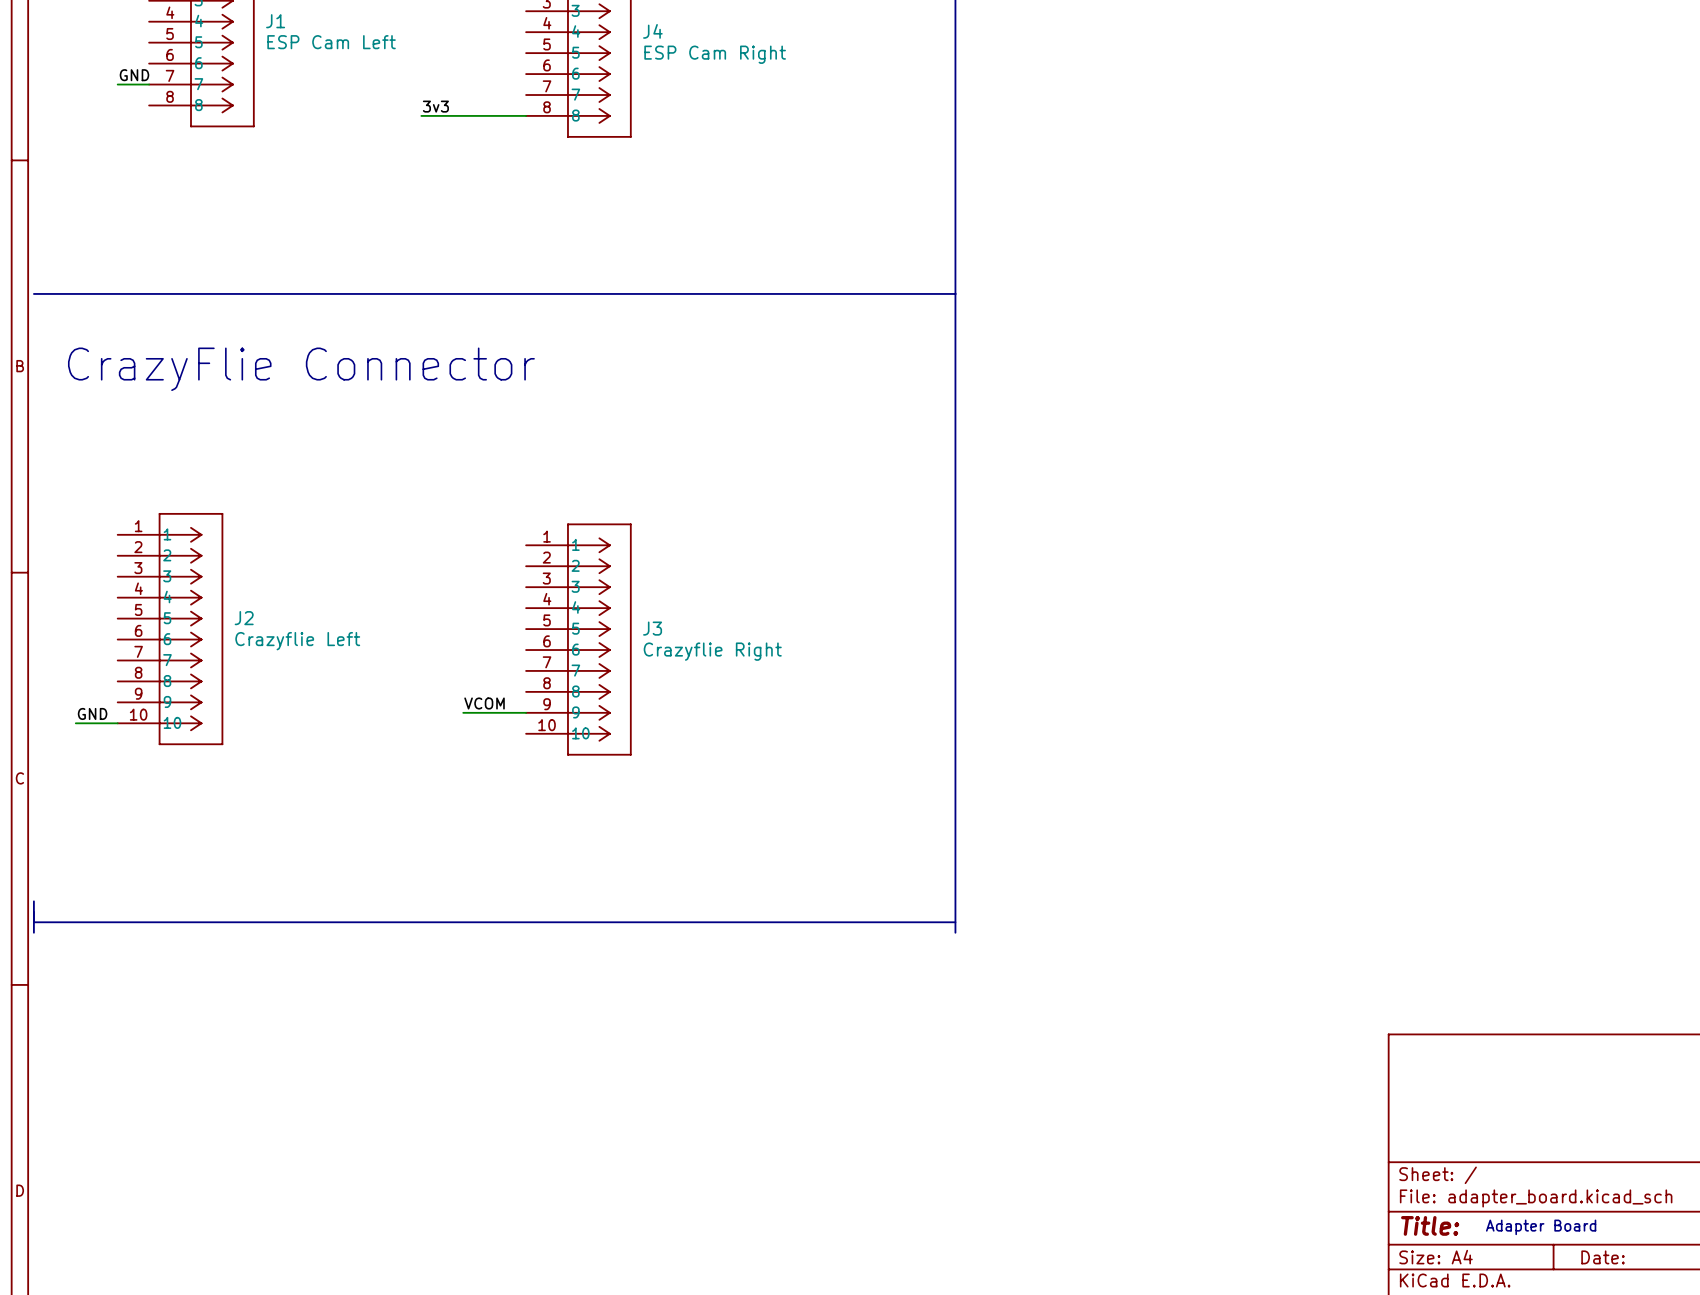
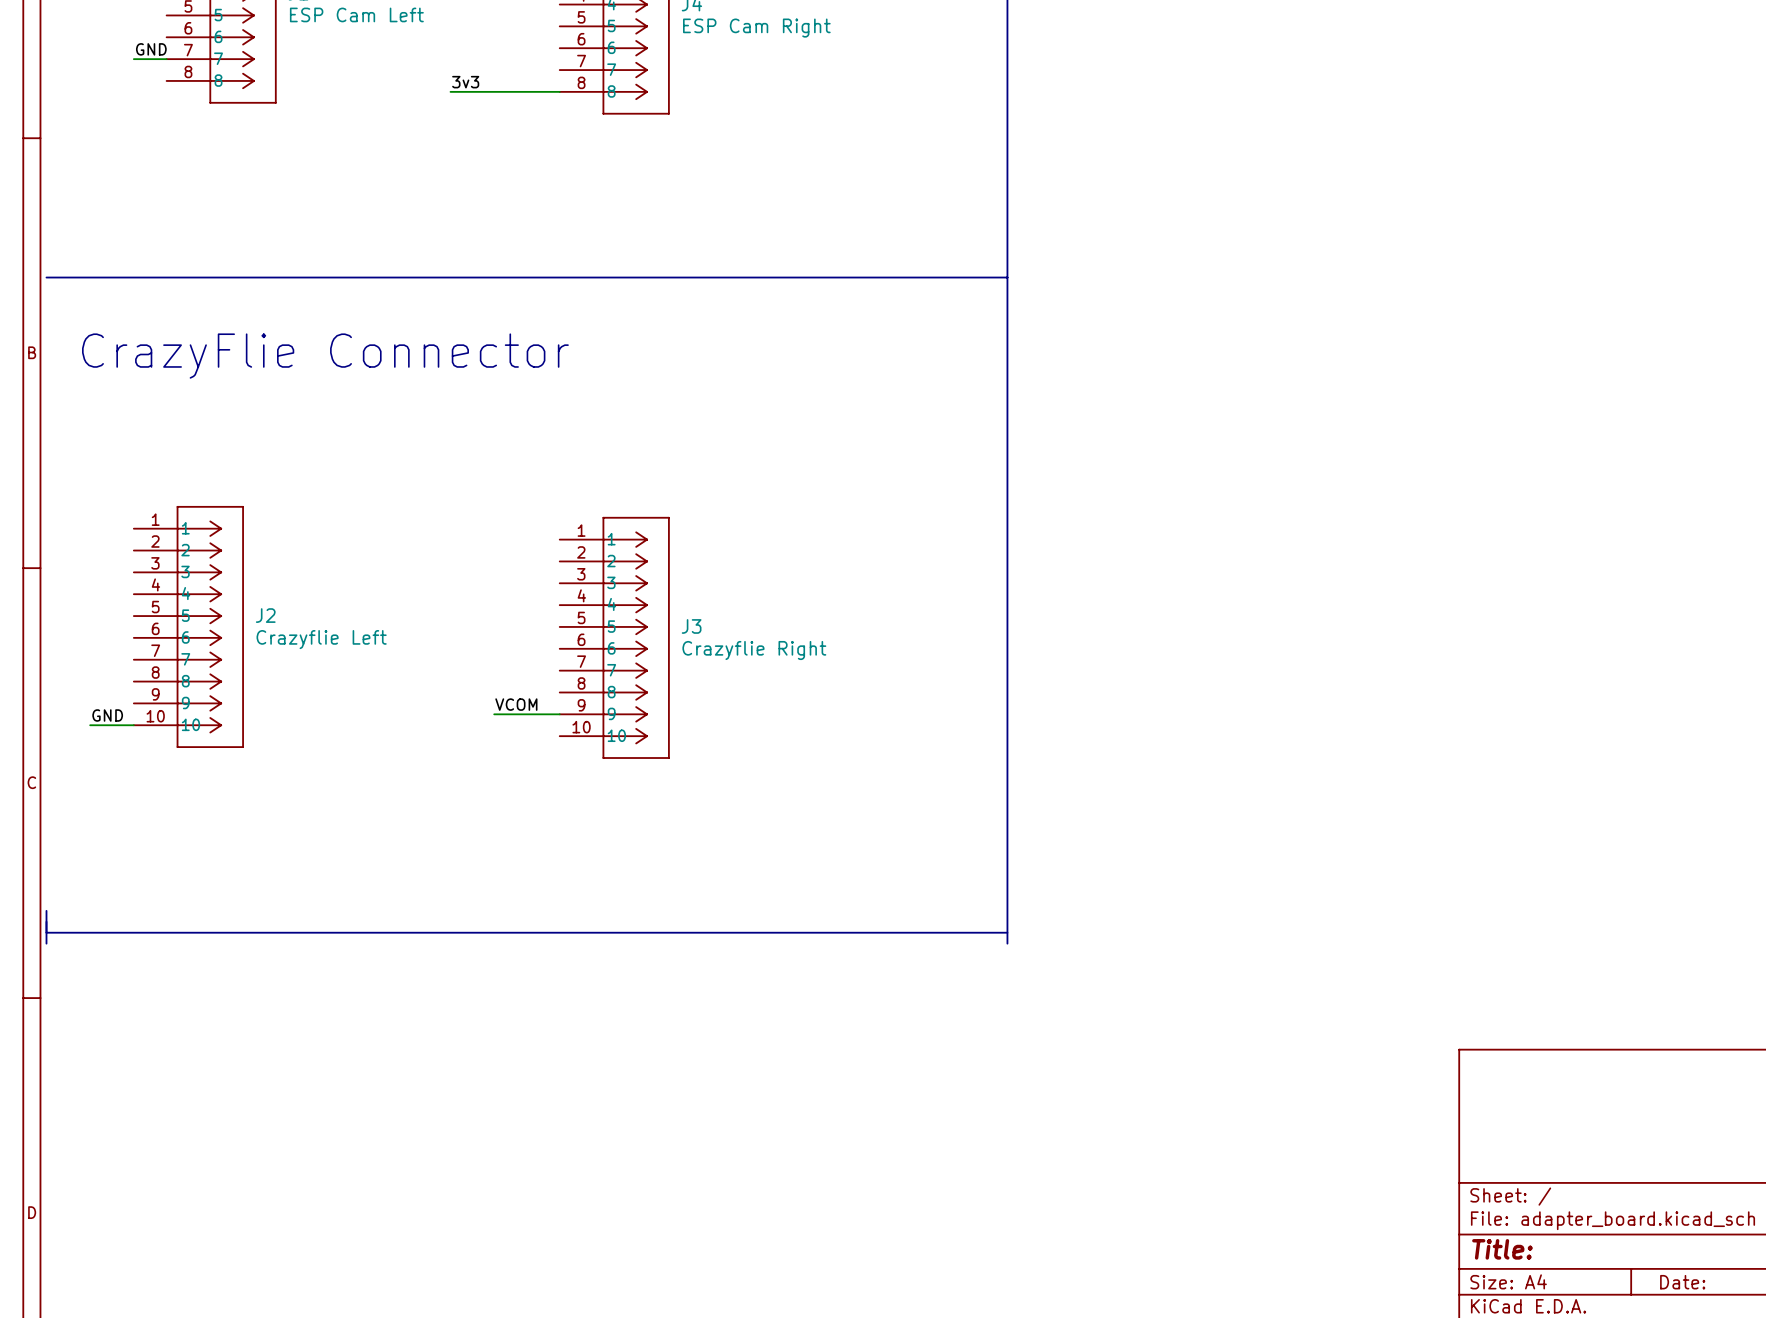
text: Adapter Board (1541, 1227) -> none

